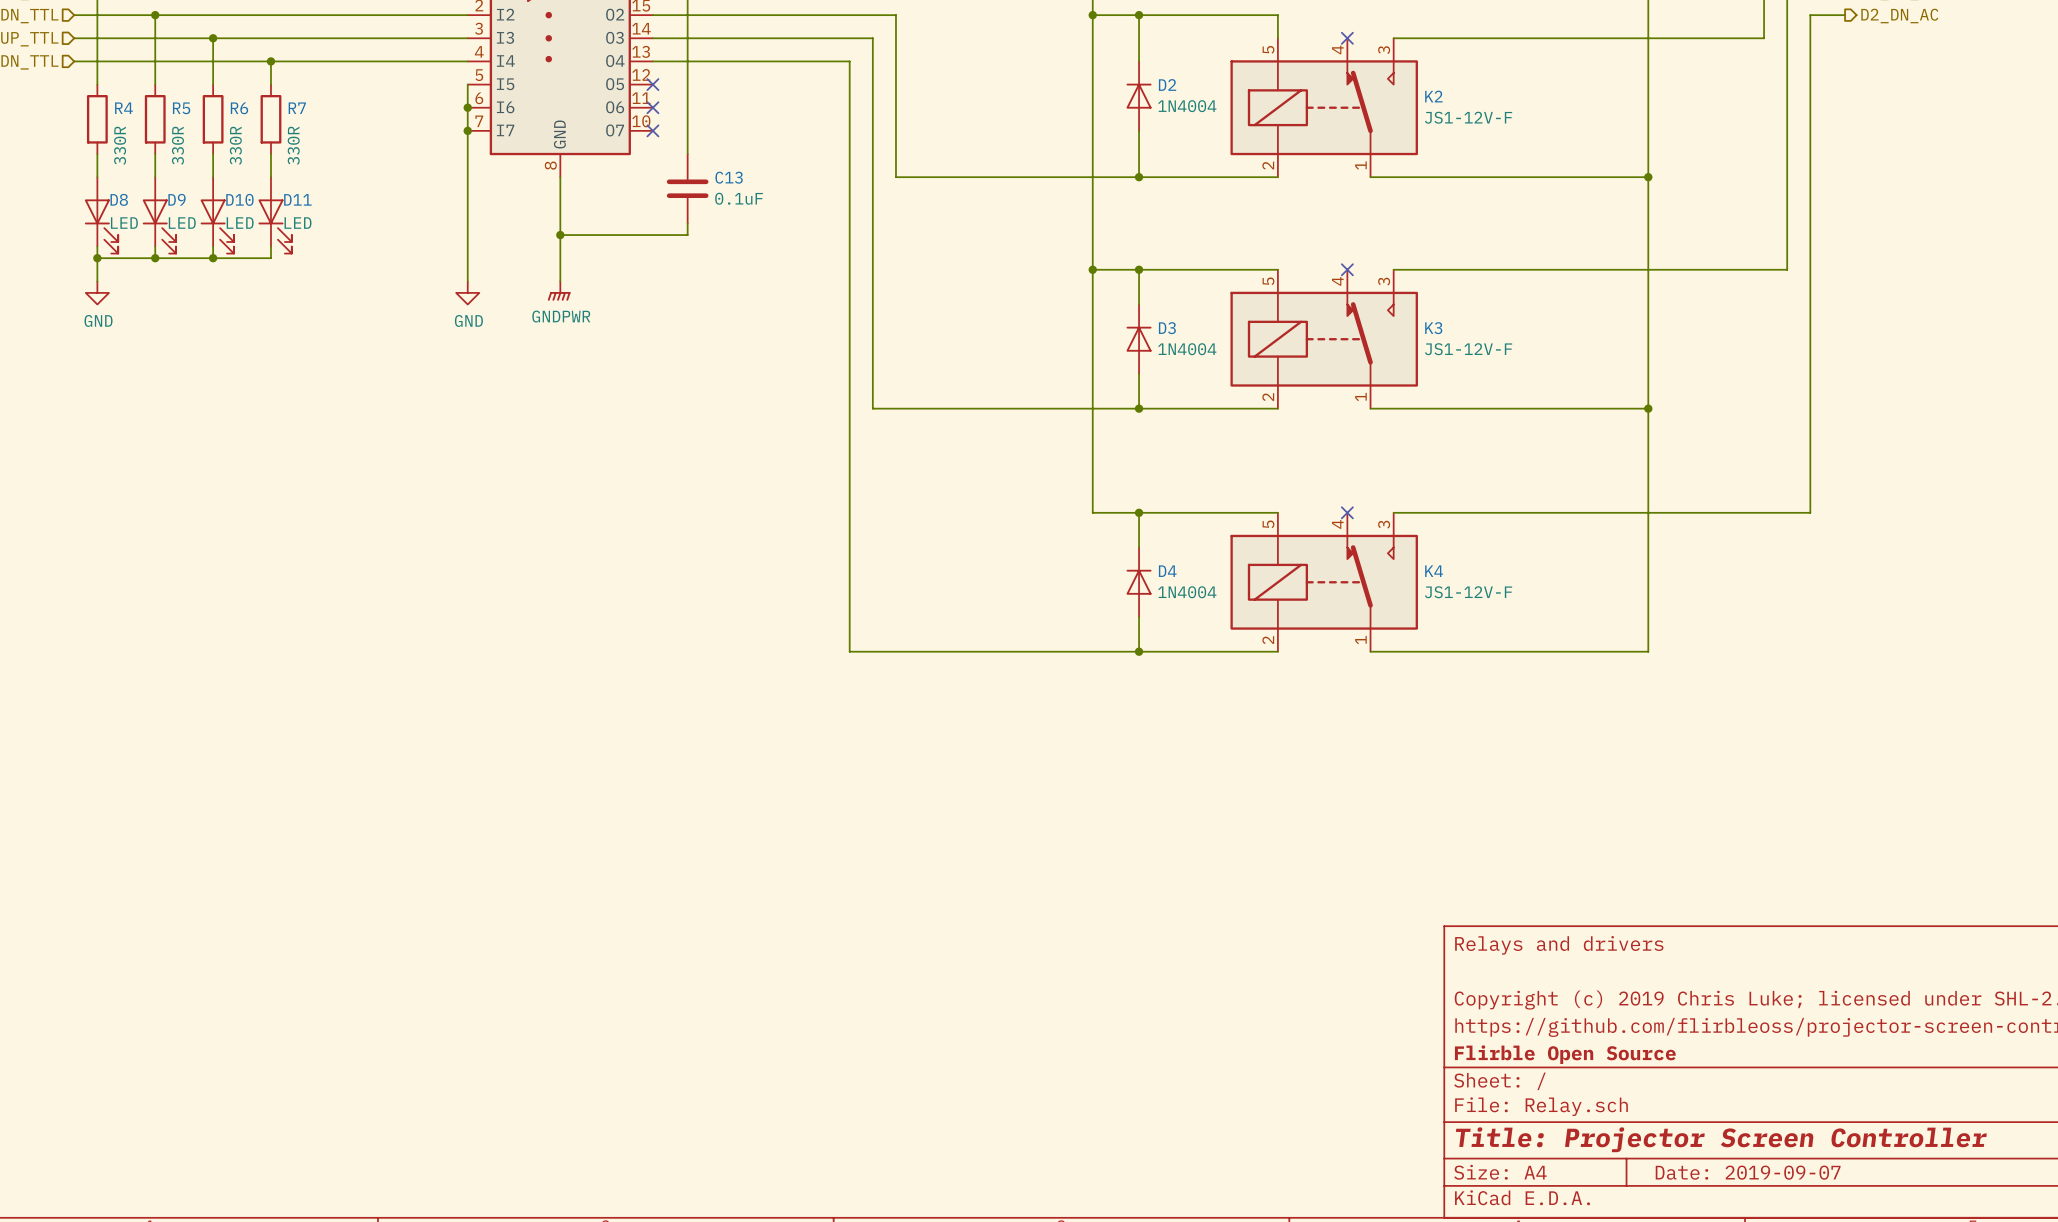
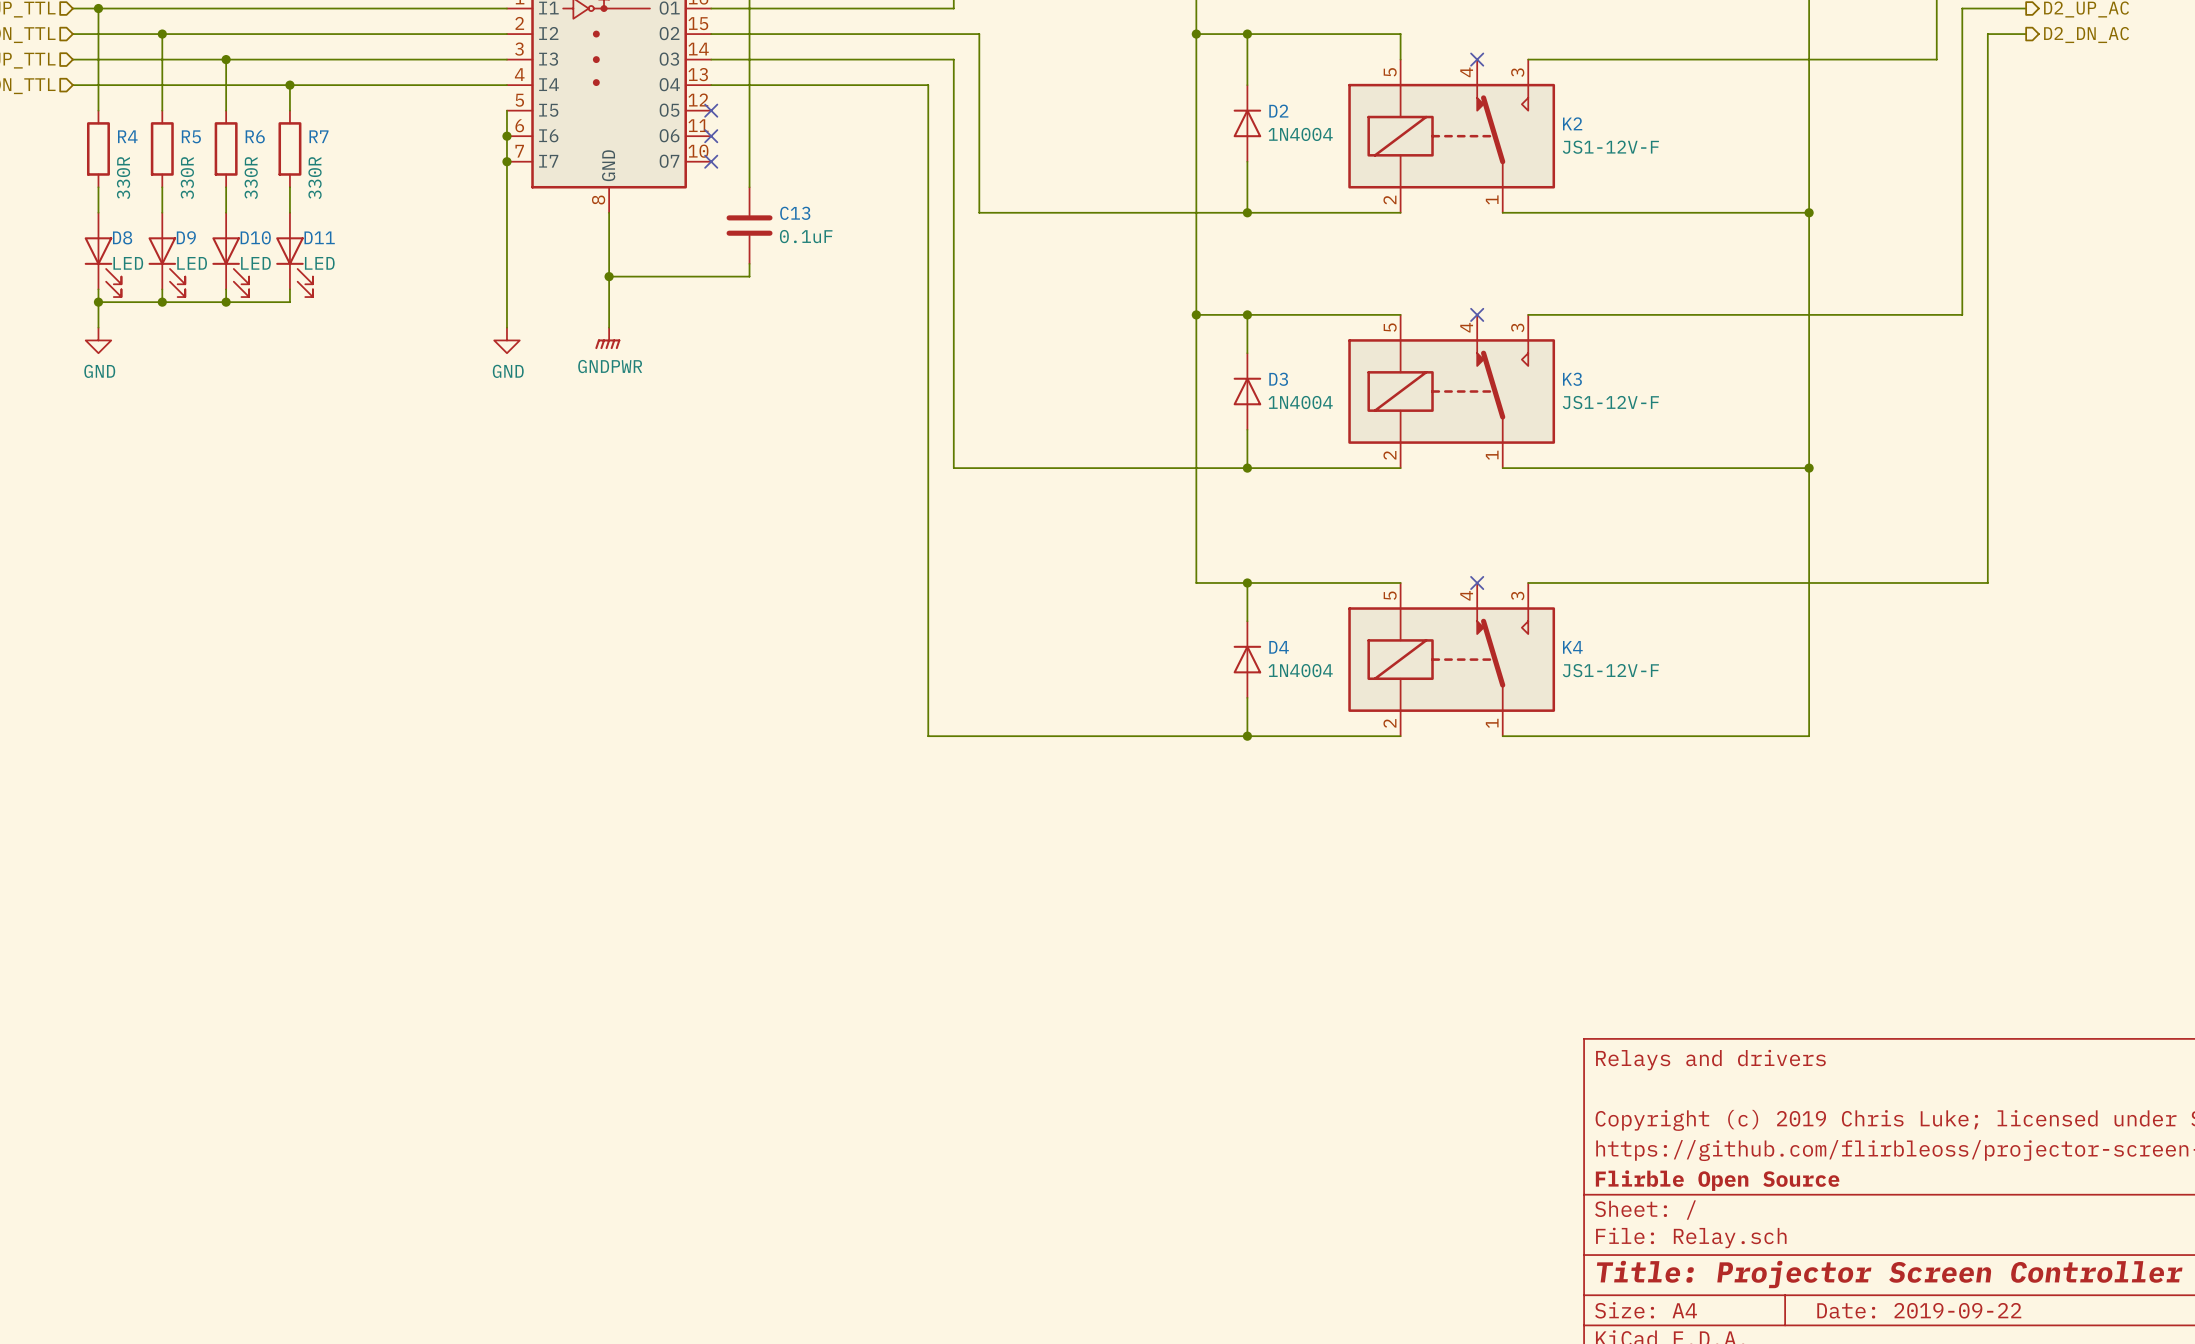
title block: Date: 2019-09-07 (1748, 1172) -> Date: 2019-09-22 (1919, 1310)

